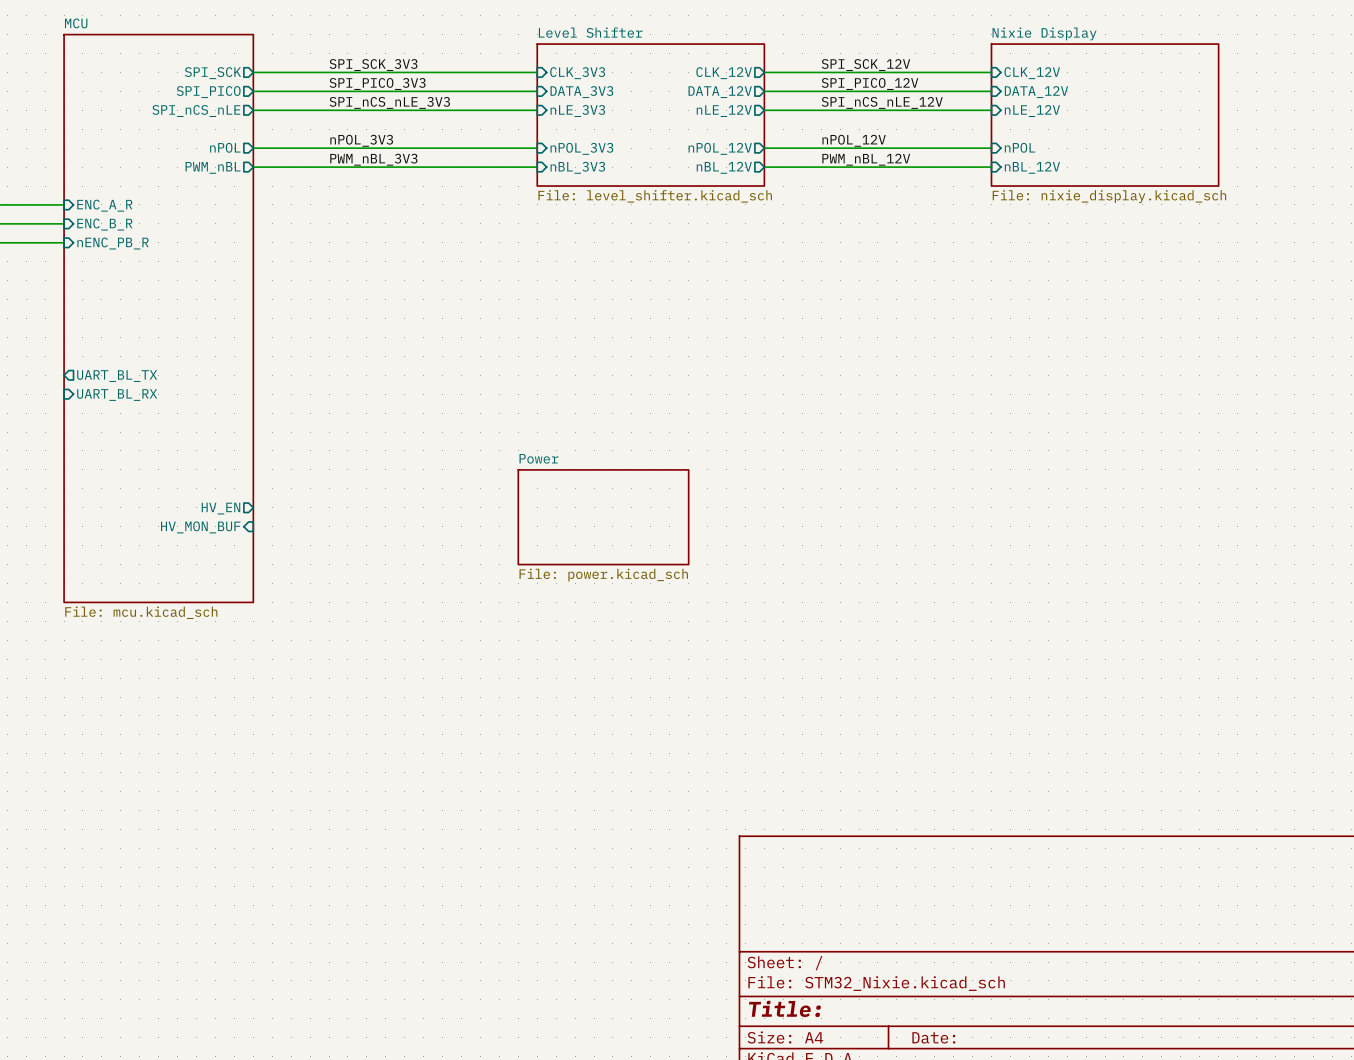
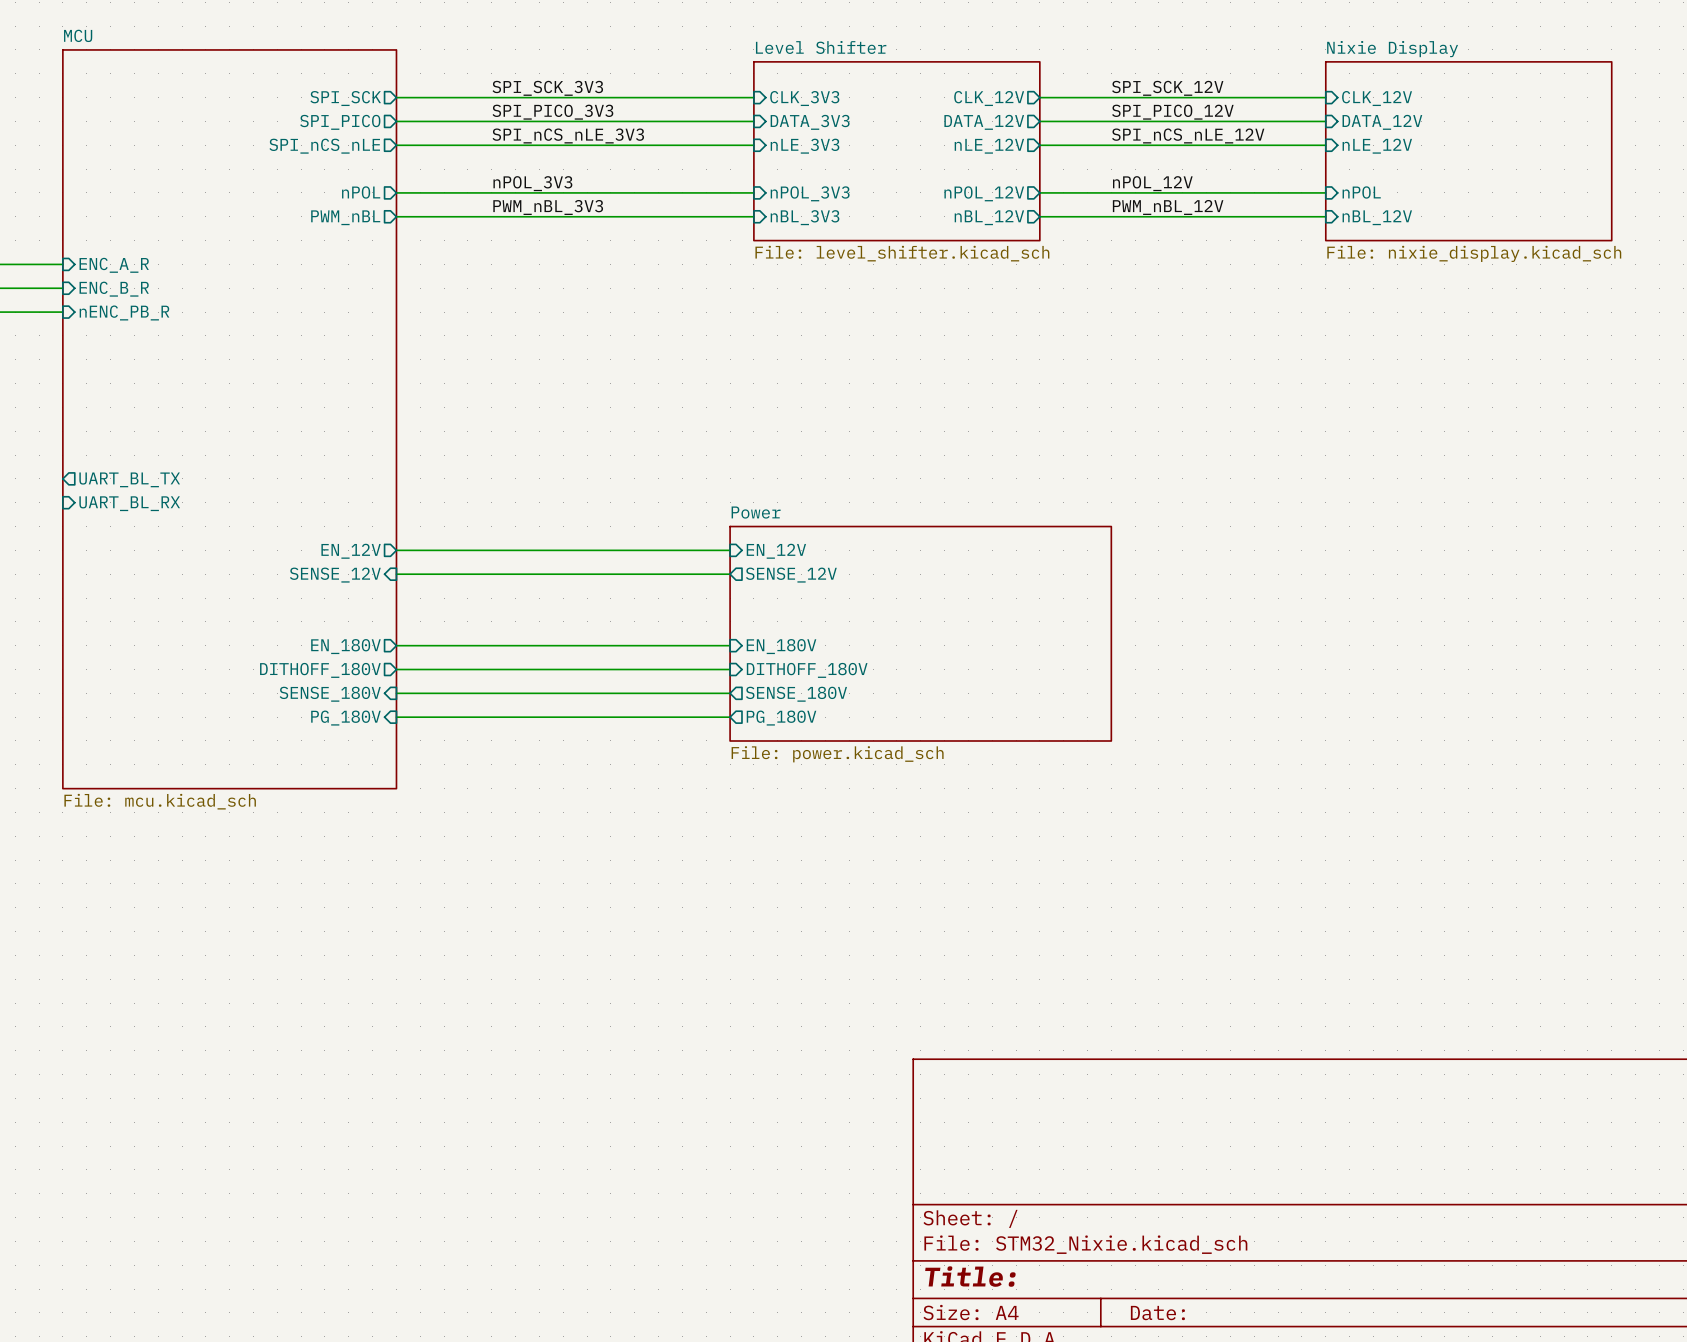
label position: SPI_SCK_3V3 (373, 65) -> SPI_SCK_3V3 (547, 88)
label position: SPI_SCK_12V (865, 65) -> SPI_SCK_12V (1167, 88)
wire: (253, 72) (329, 72) -> none
wire: none -> (658, 97) (753, 97)
wire: (764, 72) (840, 72) -> none
wire: none -> (1230, 97) (1325, 97)
sheet pin position: SPI_SCK (213, 73) -> SPI_SCK (345, 98)
sheet pin position: CLK_3V3 (577, 73) -> CLK_3V3 (804, 98)
sheet pin position: CLK_12V (724, 73) -> CLK_12V (989, 98)
sheet pin position: CLK_12V (1032, 73) -> CLK_12V (1377, 98)
label position: SPI_PICO_3V3 (377, 84) -> SPI_PICO_3V3 (552, 112)
label position: SPI_PICO_12V (870, 84) -> SPI_PICO_12V (1172, 112)
wire: (253, 91) (329, 91) -> none
wire: none -> (658, 121) (753, 121)
wire: (764, 91) (840, 91) -> none
wire: none -> (1230, 121) (1325, 121)
sheet pin position: SPI_PICO (208, 92) -> SPI_PICO (340, 122)
sheet pin position: DATA_3V3 (581, 92) -> DATA_3V3 (810, 122)
sheet pin position: DATA_12V (720, 92) -> DATA_12V (984, 122)
sheet pin position: DATA_12V (1036, 92) -> DATA_12V (1382, 122)
label position: SPI_nCS_nLE_3V3 (389, 102) -> SPI_nCS_nLE_3V3 (568, 135)
label position: SPI_nCS_nLE_12V (882, 102) -> SPI_nCS_nLE_12V (1188, 135)
wire: (253, 110) (329, 110) -> none
wire: none -> (658, 145) (753, 145)
wire: (764, 110) (840, 110) -> none
wire: none -> (1230, 145) (1325, 145)
sheet pin position: SPI_nCS_nLE (196, 111) -> SPI_nCS_nLE (324, 146)
sheet pin position: nLE_3V3 (577, 111) -> nLE_3V3 (805, 146)
sheet pin position: nLE_12V (724, 111) -> nLE_12V (989, 146)
sheet pin position: nLE_12V (1032, 111) -> nLE_12V (1377, 146)
sheet Level Shifter position: (650, 115) -> (896, 151)
sheet Nixie Display position: (1105, 115) -> (1468, 151)
label position: nPOL_3V3 (361, 140) -> nPOL_3V3 (532, 183)
label position: nPOL_12V (854, 140) -> nPOL_12V (1152, 183)
sheet pin position: nPOL (225, 147) -> nPOL (361, 192)
sheet pin position: nPOL (1020, 147) -> nPOL (1361, 192)
wire: (253, 148) (329, 148) -> none
wire: none -> (658, 192) (753, 192)
sheet pin position: nPOL_3V3 (581, 148) -> nPOL_3V3 (810, 193)
sheet pin position: nPOL_12V (720, 148) -> nPOL_12V (984, 193)
wire: (764, 148) (840, 148) -> none
wire: none -> (1230, 192) (1325, 192)
label position: PWM_nBL_3V3 (373, 159) -> PWM_nBL_3V3 (548, 207)
label position: PWM_nBL_12V (866, 159) -> PWM_nBL_12V (1168, 207)
sheet pin position: PWM_nBL (213, 167) -> PWM_nBL (345, 217)
wire: (253, 167) (329, 167) -> none
wire: none -> (658, 216) (753, 216)
sheet pin position: nBL_3V3 (577, 167) -> nBL_3V3 (805, 217)
sheet pin position: nBL_12V (724, 167) -> nBL_12V (989, 217)
wire: (764, 167) (840, 167) -> none
wire: none -> (1230, 216) (1325, 216)
sheet pin position: nBL_12V (1032, 167) -> nBL_12V (1377, 217)
sheet MCU: File: mcu.kicad_sch (158, 318) -> none
sheet MCU: none -> File: mcu.kicad_sch (229, 419)
sheet pin: none -> EN_12V (351, 551)
wire: none -> (396, 550) (730, 550)
sheet pin: none -> EN_12V (776, 551)
wire: none -> (396, 574) (730, 574)
sheet pin: none -> SENSE_12V (335, 575)
sheet pin: none -> SENSE_12V (791, 575)
sheet Power: none -> File: power.kicad_sch (920, 633)
wire: none -> (396, 645) (730, 645)
sheet pin: HV_EN (220, 508) -> none
sheet pin: none -> EN_180V (345, 646)
sheet pin: none -> EN_180V (781, 646)
sheet Power: File: power.kicad_sch (603, 517) -> none
wire: none -> (396, 669) (730, 669)
sheet pin: HV_MON_BUF (200, 527) -> none
sheet pin: none -> DITHOFF_180V (320, 670)
sheet pin: none -> DITHOFF_180V (807, 670)
wire: none -> (396, 693) (730, 693)
sheet pin: none -> SENSE_180V (330, 694)
sheet pin: none -> SENSE_180V (796, 694)
wire: none -> (396, 717) (730, 717)
sheet pin: none -> PG_180V (345, 718)
sheet pin: none -> PG_180V (781, 718)

